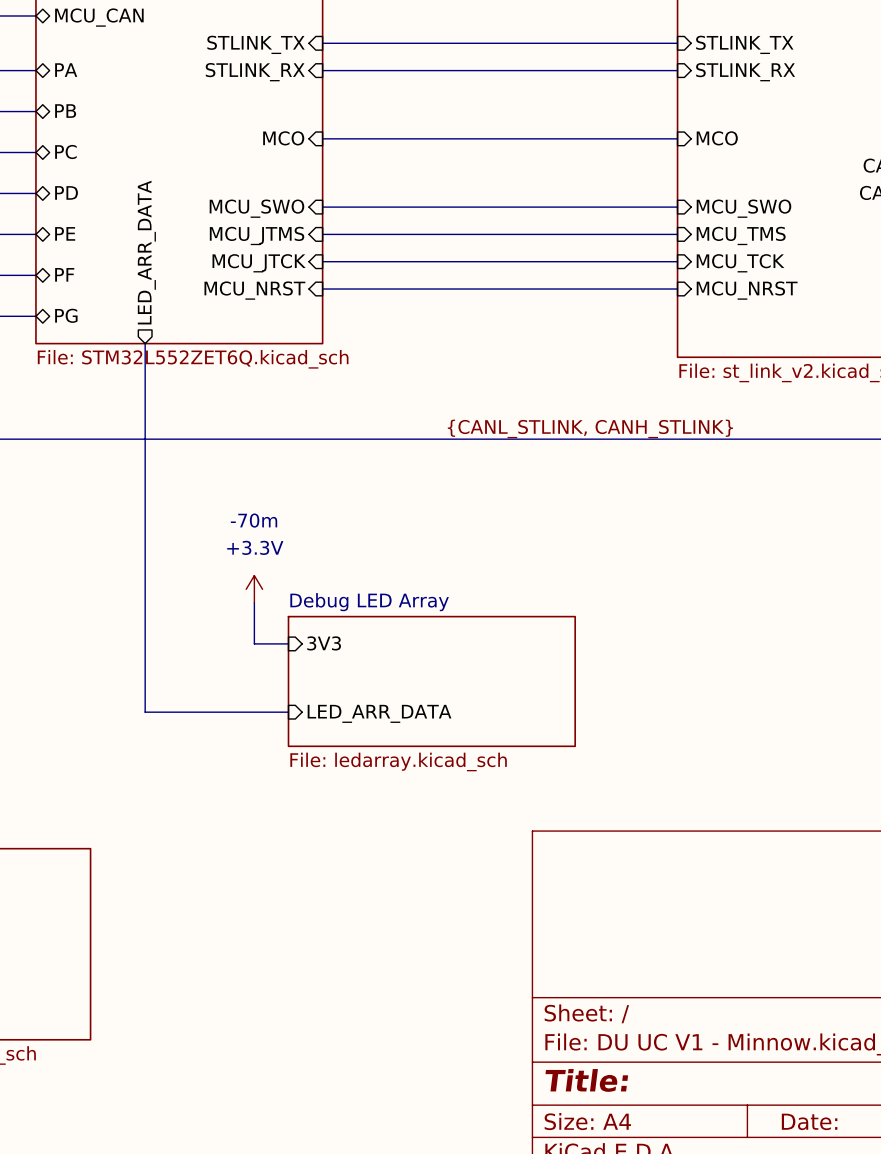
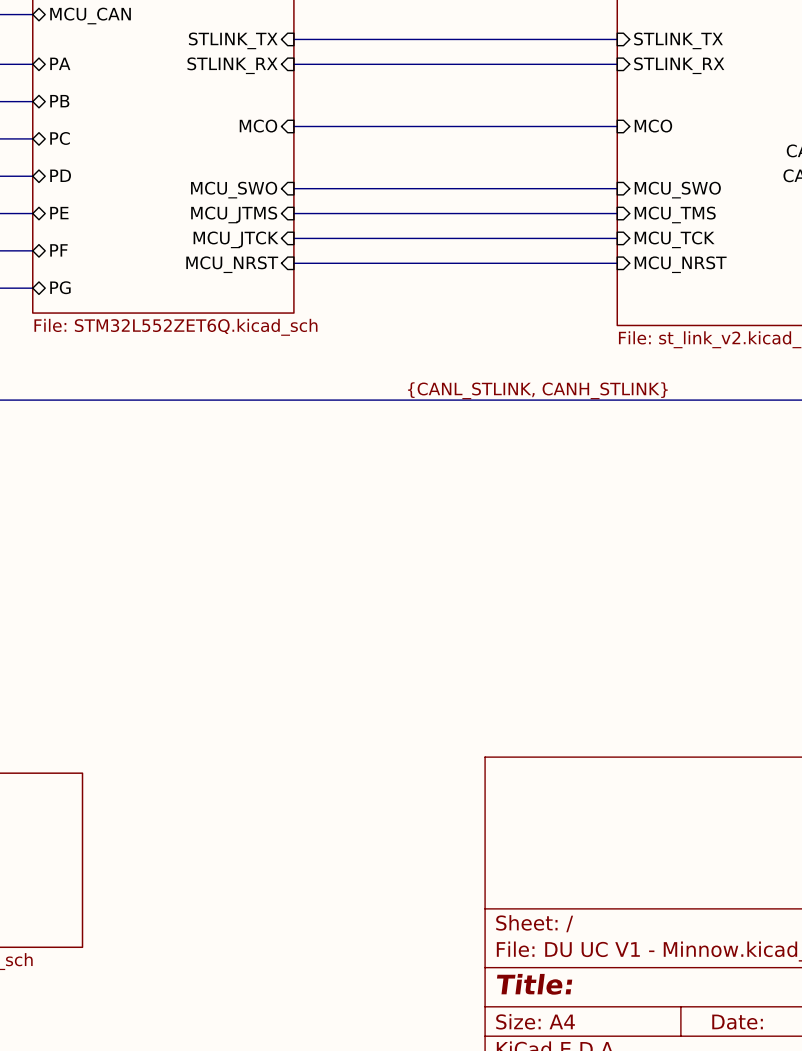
sheet pin: LED_ARR_DATA (146, 252) -> none
bus: (145, 343) (145, 712) (288, 712) -> none
power symbol: +3.3V (254, 589) -> none
wire: (254, 602) (254, 643) (288, 643) -> none
sheet pin: 3V3 (324, 643) -> none
sheet Debug LED Array: File: ledarray.kicad_sch (431, 681) -> none
sheet pin: LED_ARR_DATA (379, 713) -> none

